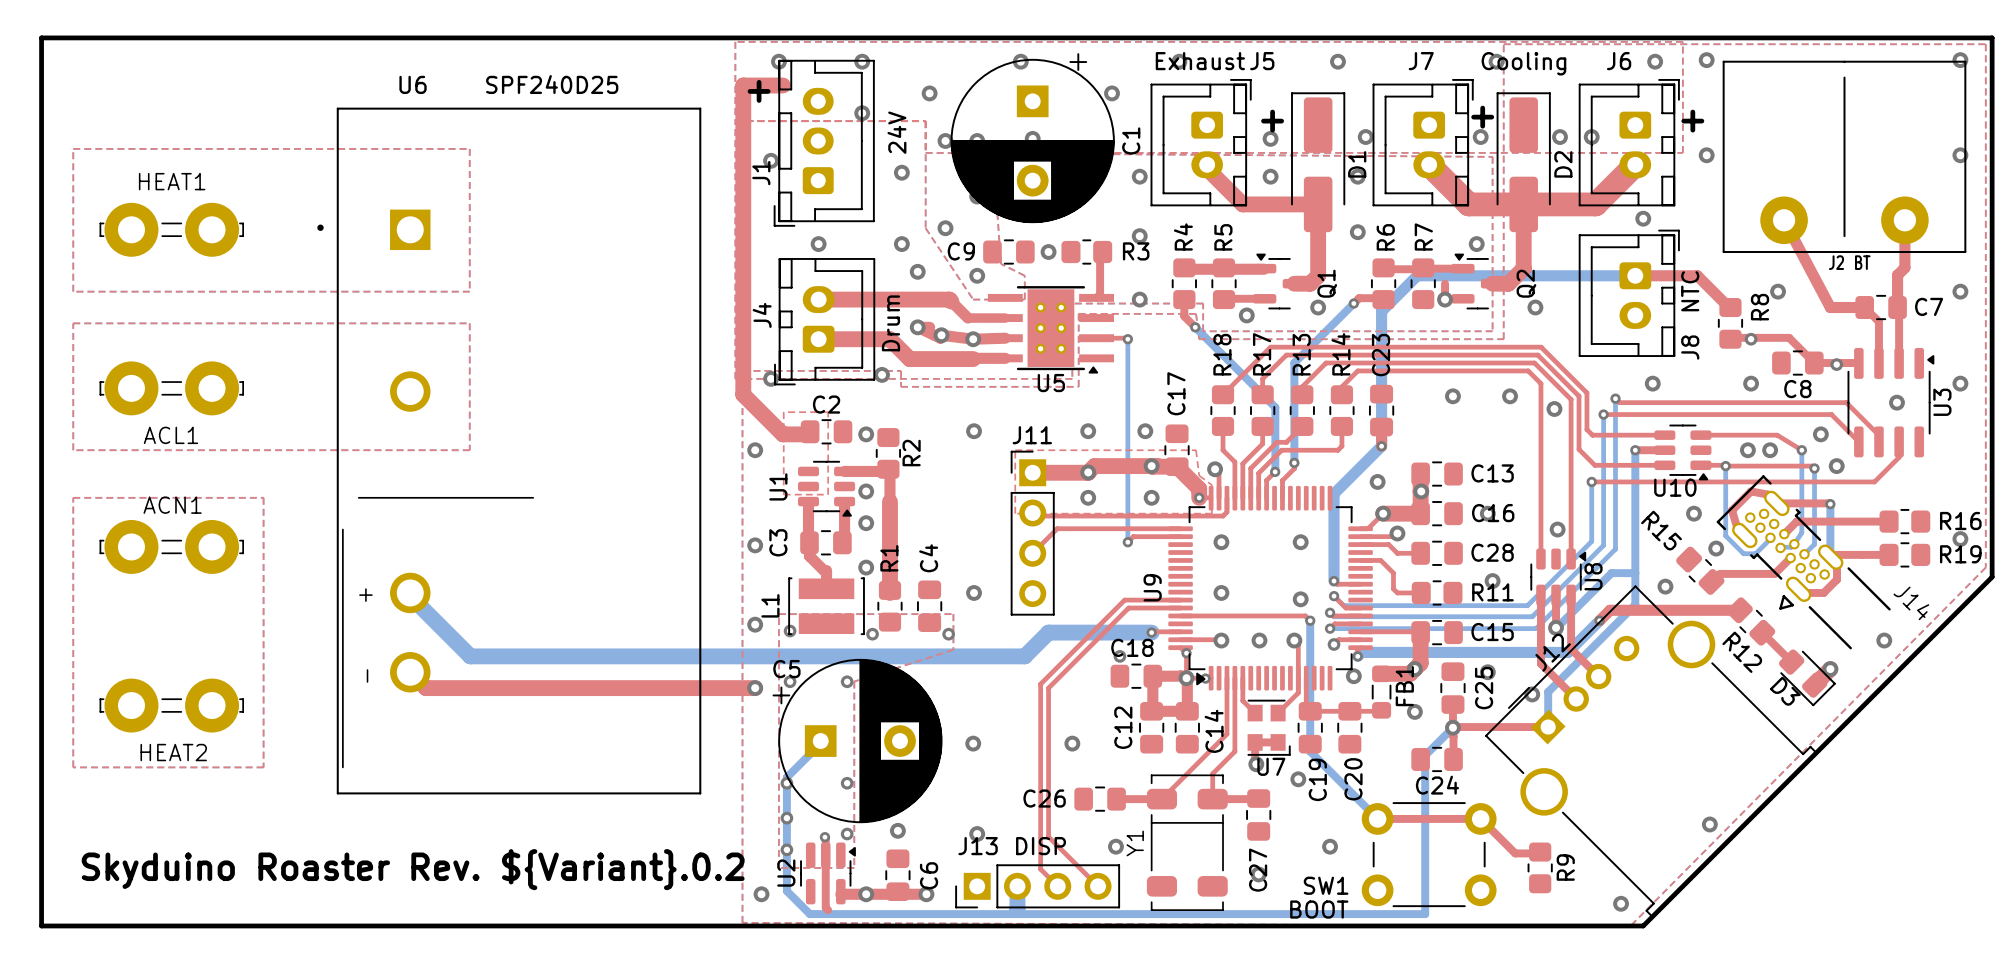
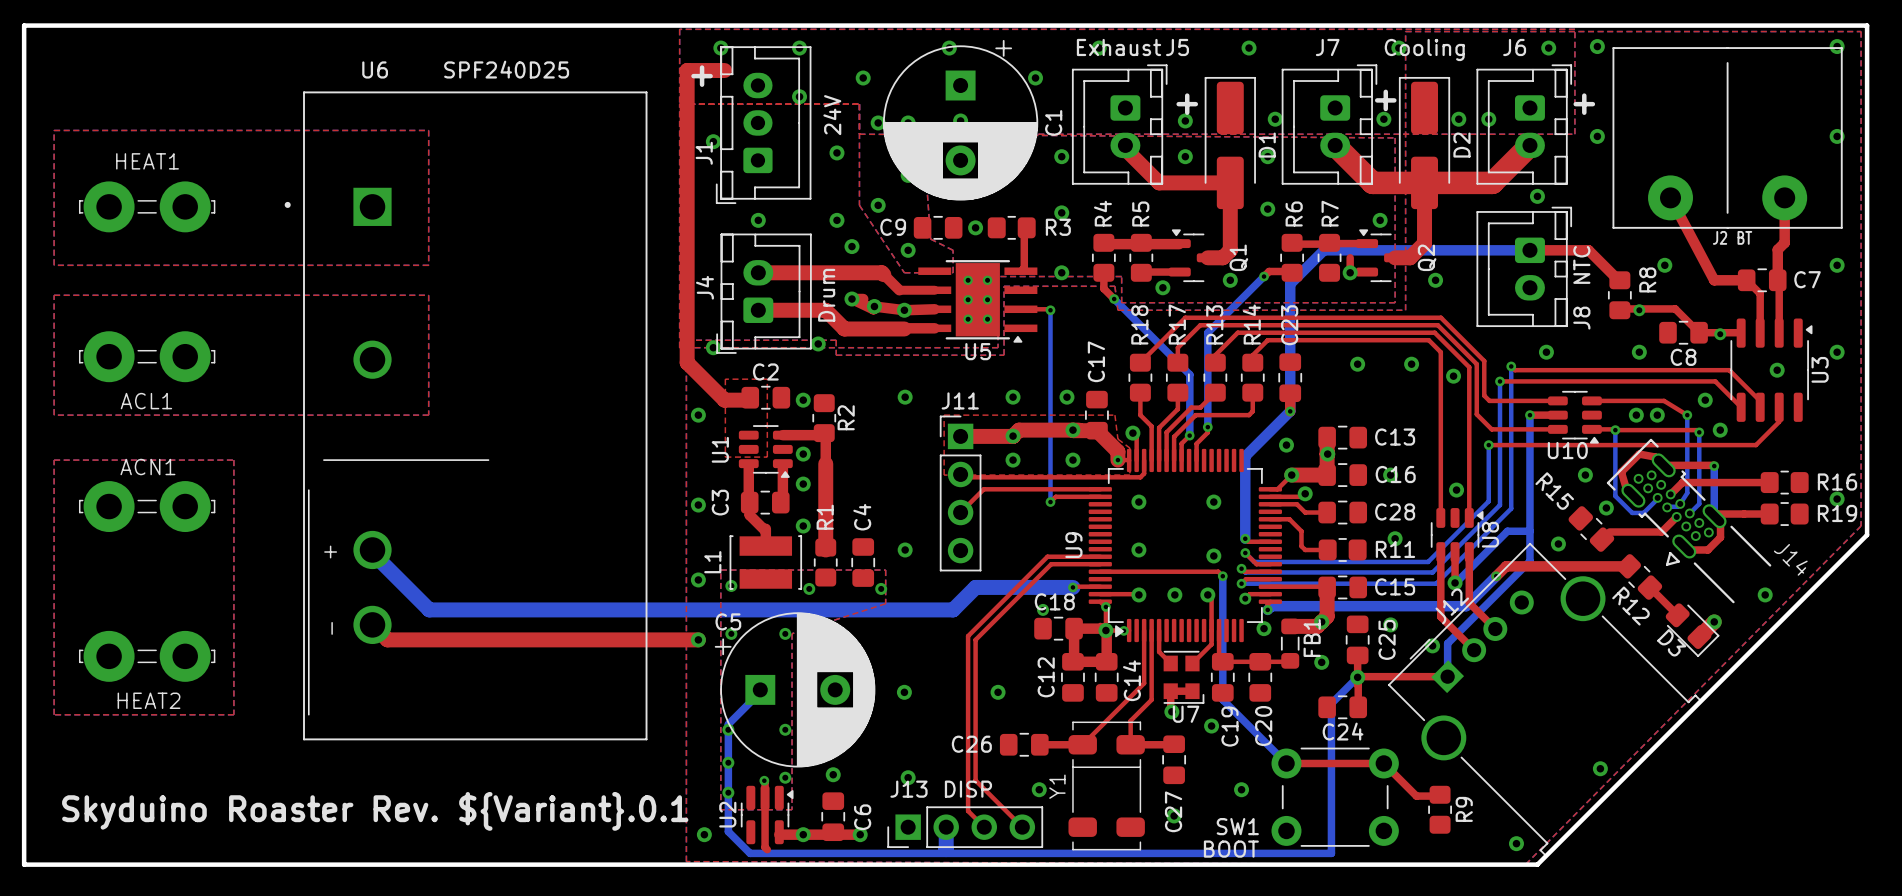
text: Skyduino Roaster Rev. ${Variant}.0.2 (413, 869) -> Skyduino Roaster Rev. ${Variant}.0.1 (375, 811)

